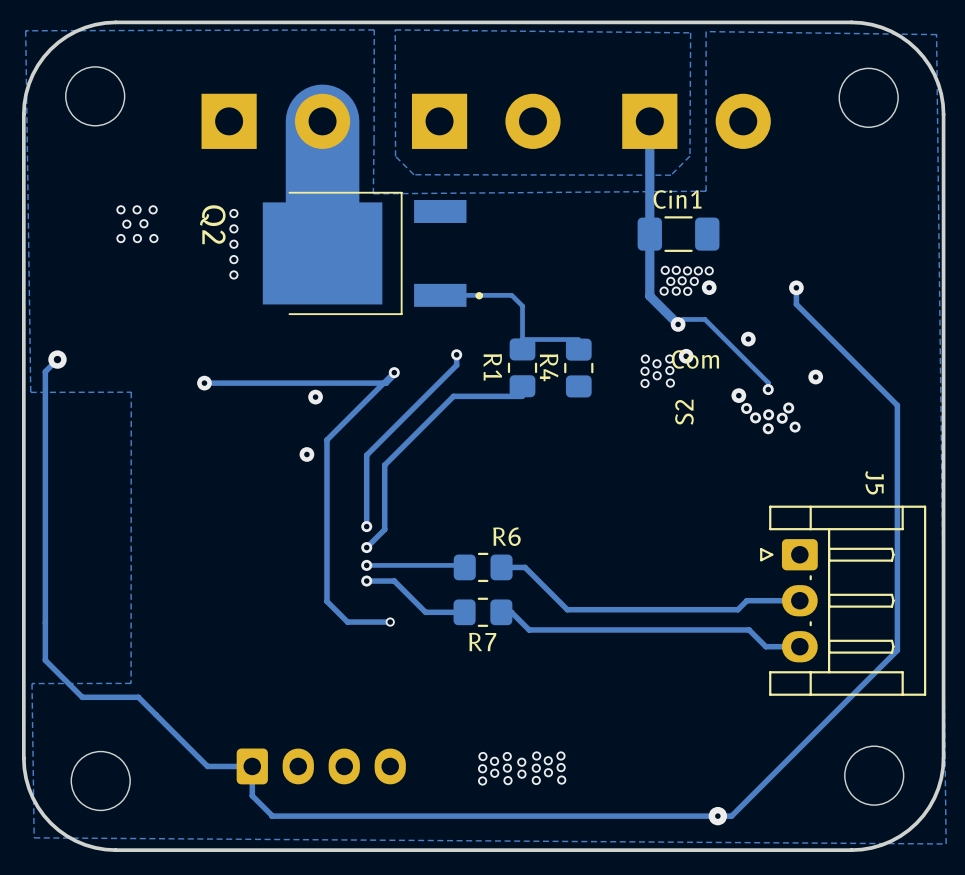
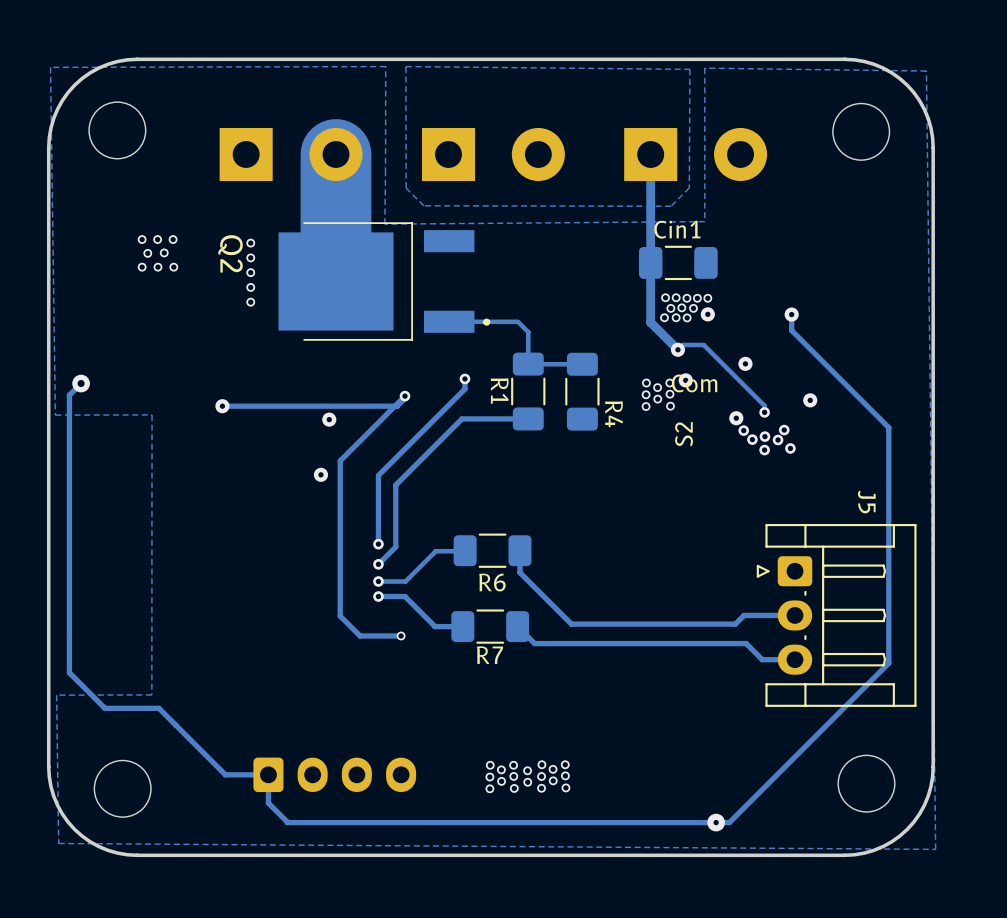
R1 footprint: [507, 338, 538, 398] -> [511, 352, 546, 431]
R4 footprint: [564, 338, 594, 398] -> [565, 352, 600, 431]
R4 name position: R4 (549, 367) -> R4 (614, 414)
R6 name position: R6 (506, 536) -> R6 (492, 582)
R6 footprint: [453, 552, 513, 583] -> [453, 533, 532, 568]
track: (394, 565) (462, 565) (464, 567) -> (405, 581) (435, 551) (464, 551)
track: (525, 567) (501, 567) -> (530, 583) (519, 572) (519, 550)
R7 footprint: [453, 597, 513, 627] -> [451, 609, 530, 644]

